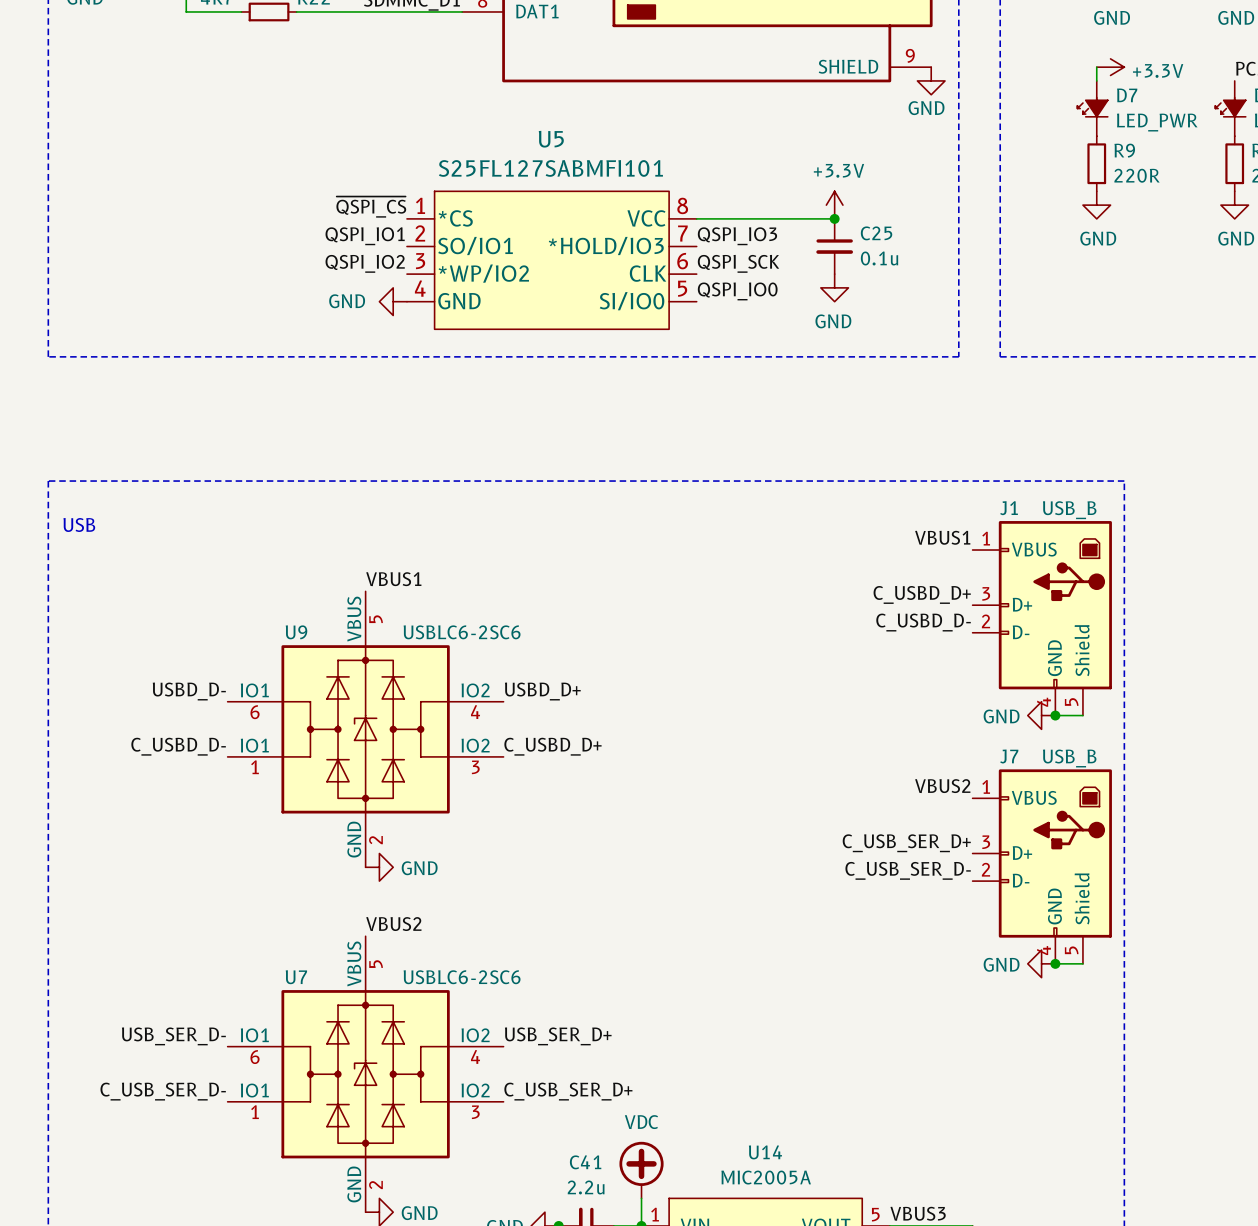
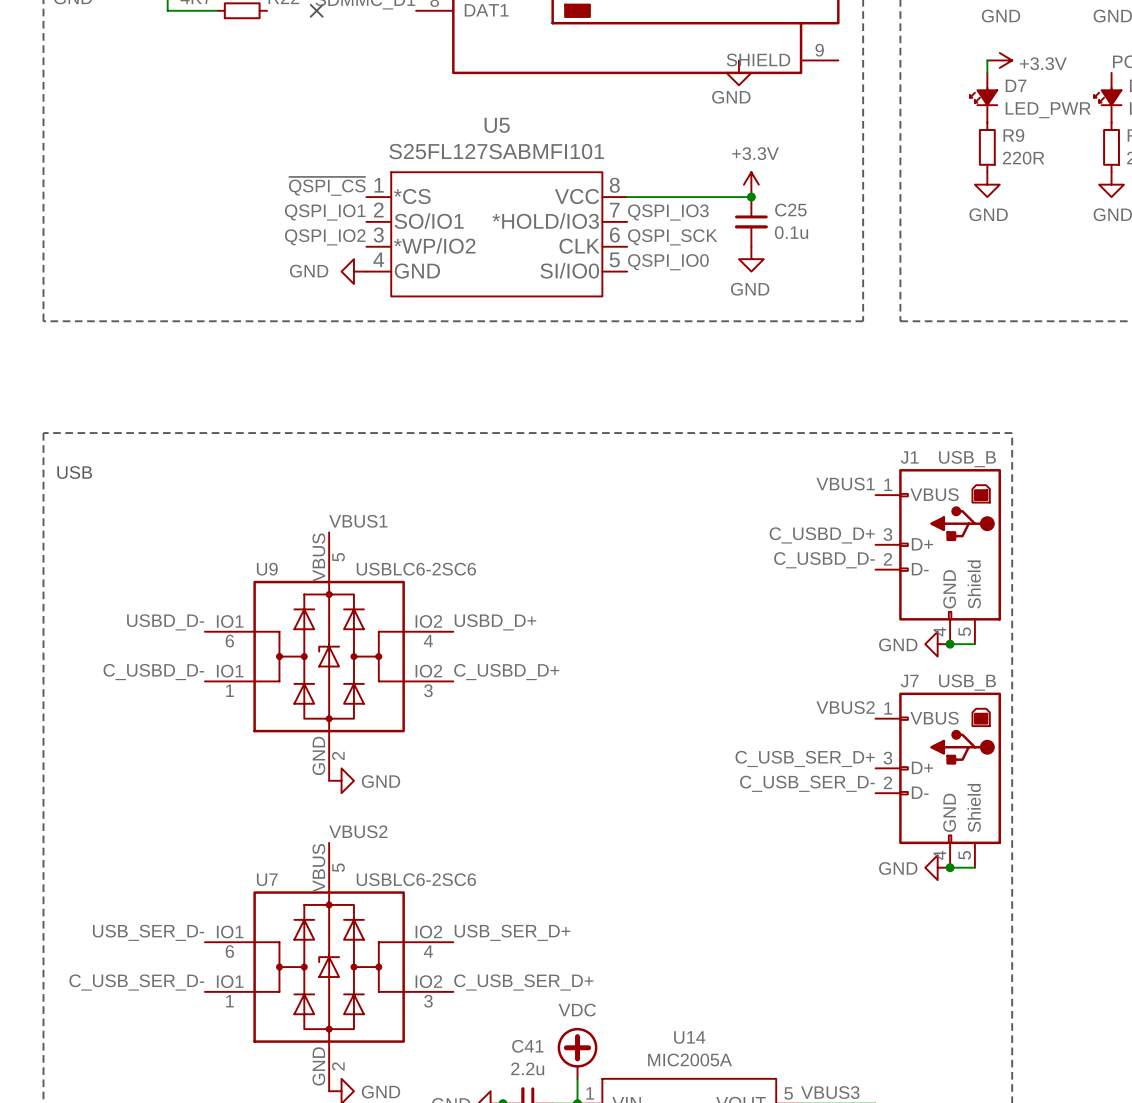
wire: (296, 11) (462, 11) -> none
no-connect mark: none -> (316, 10)
power symbol position: GND (931, 80) -> GND (738, 72)

